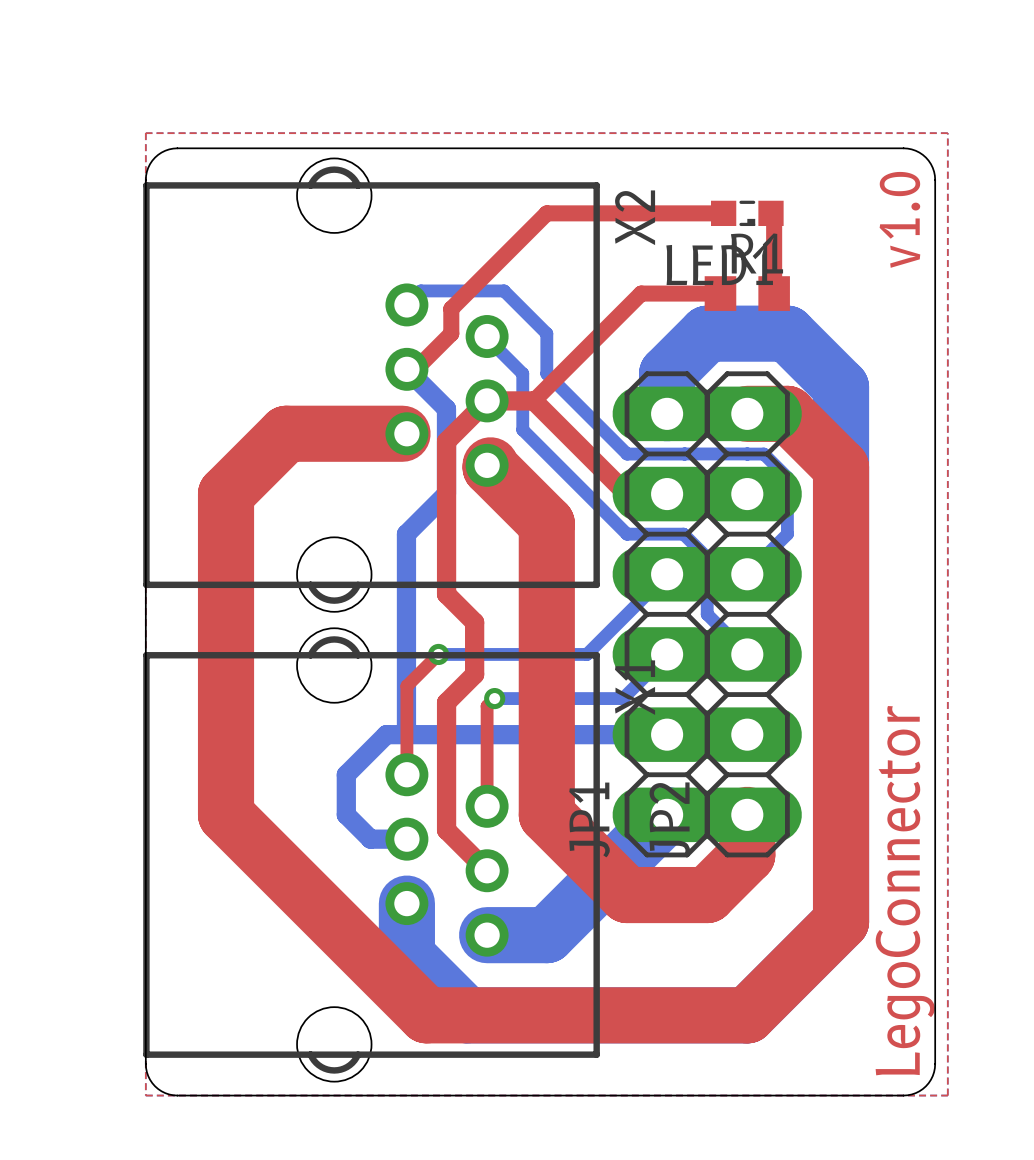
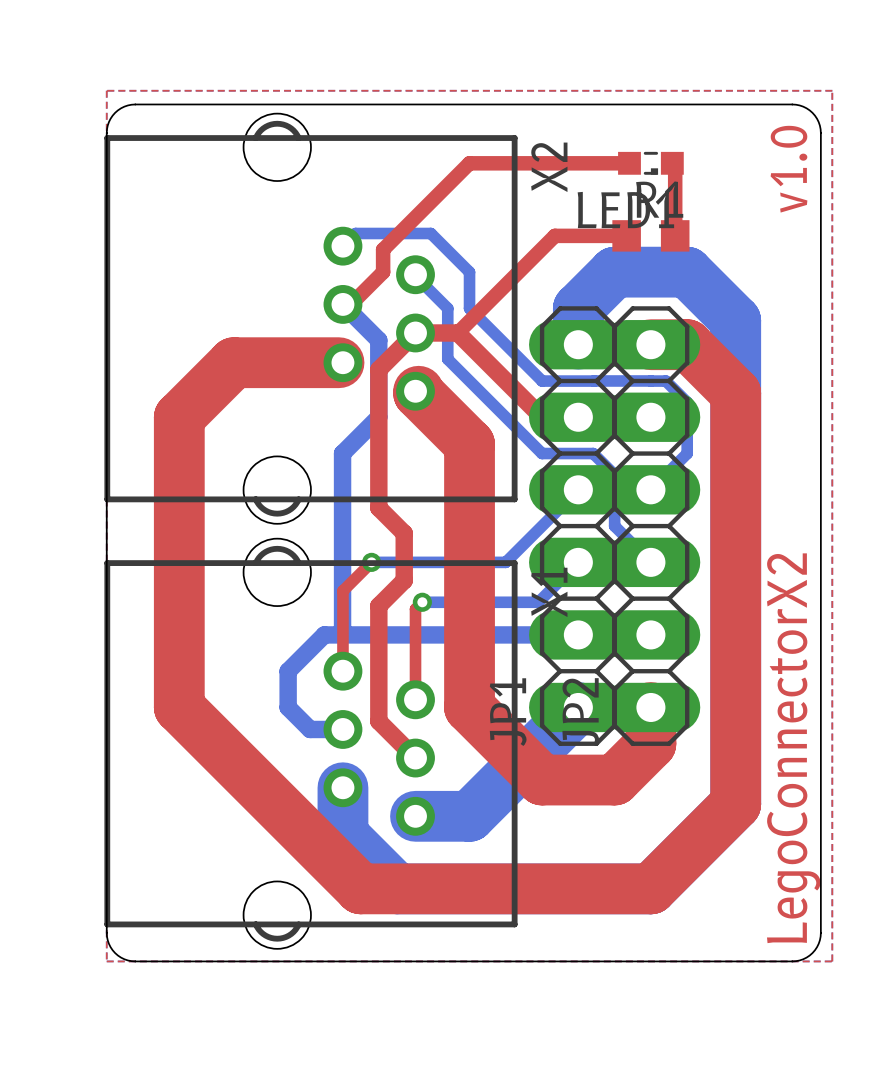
text: LegoConnector (905, 890) -> LegoConnectorX2 (793, 748)

